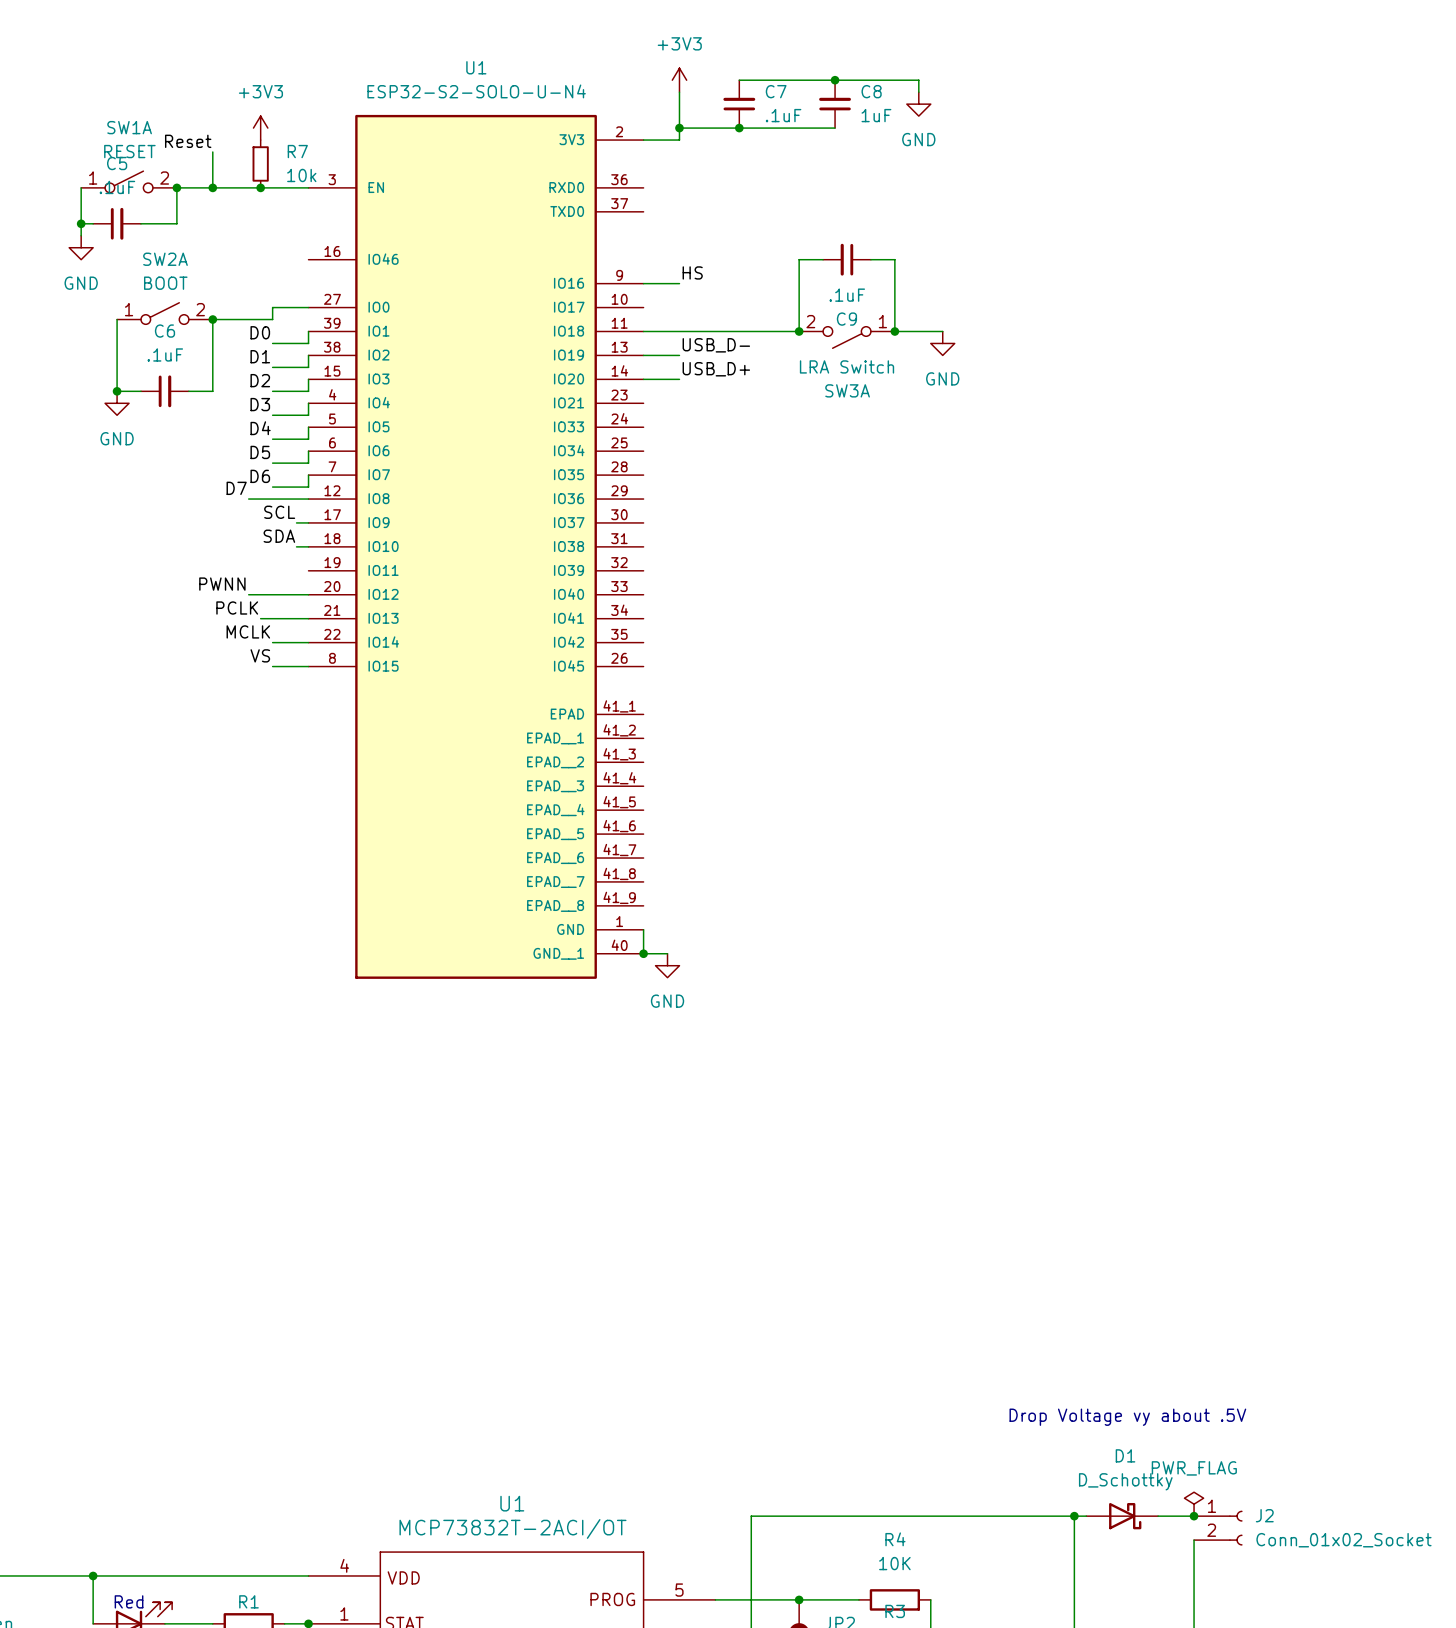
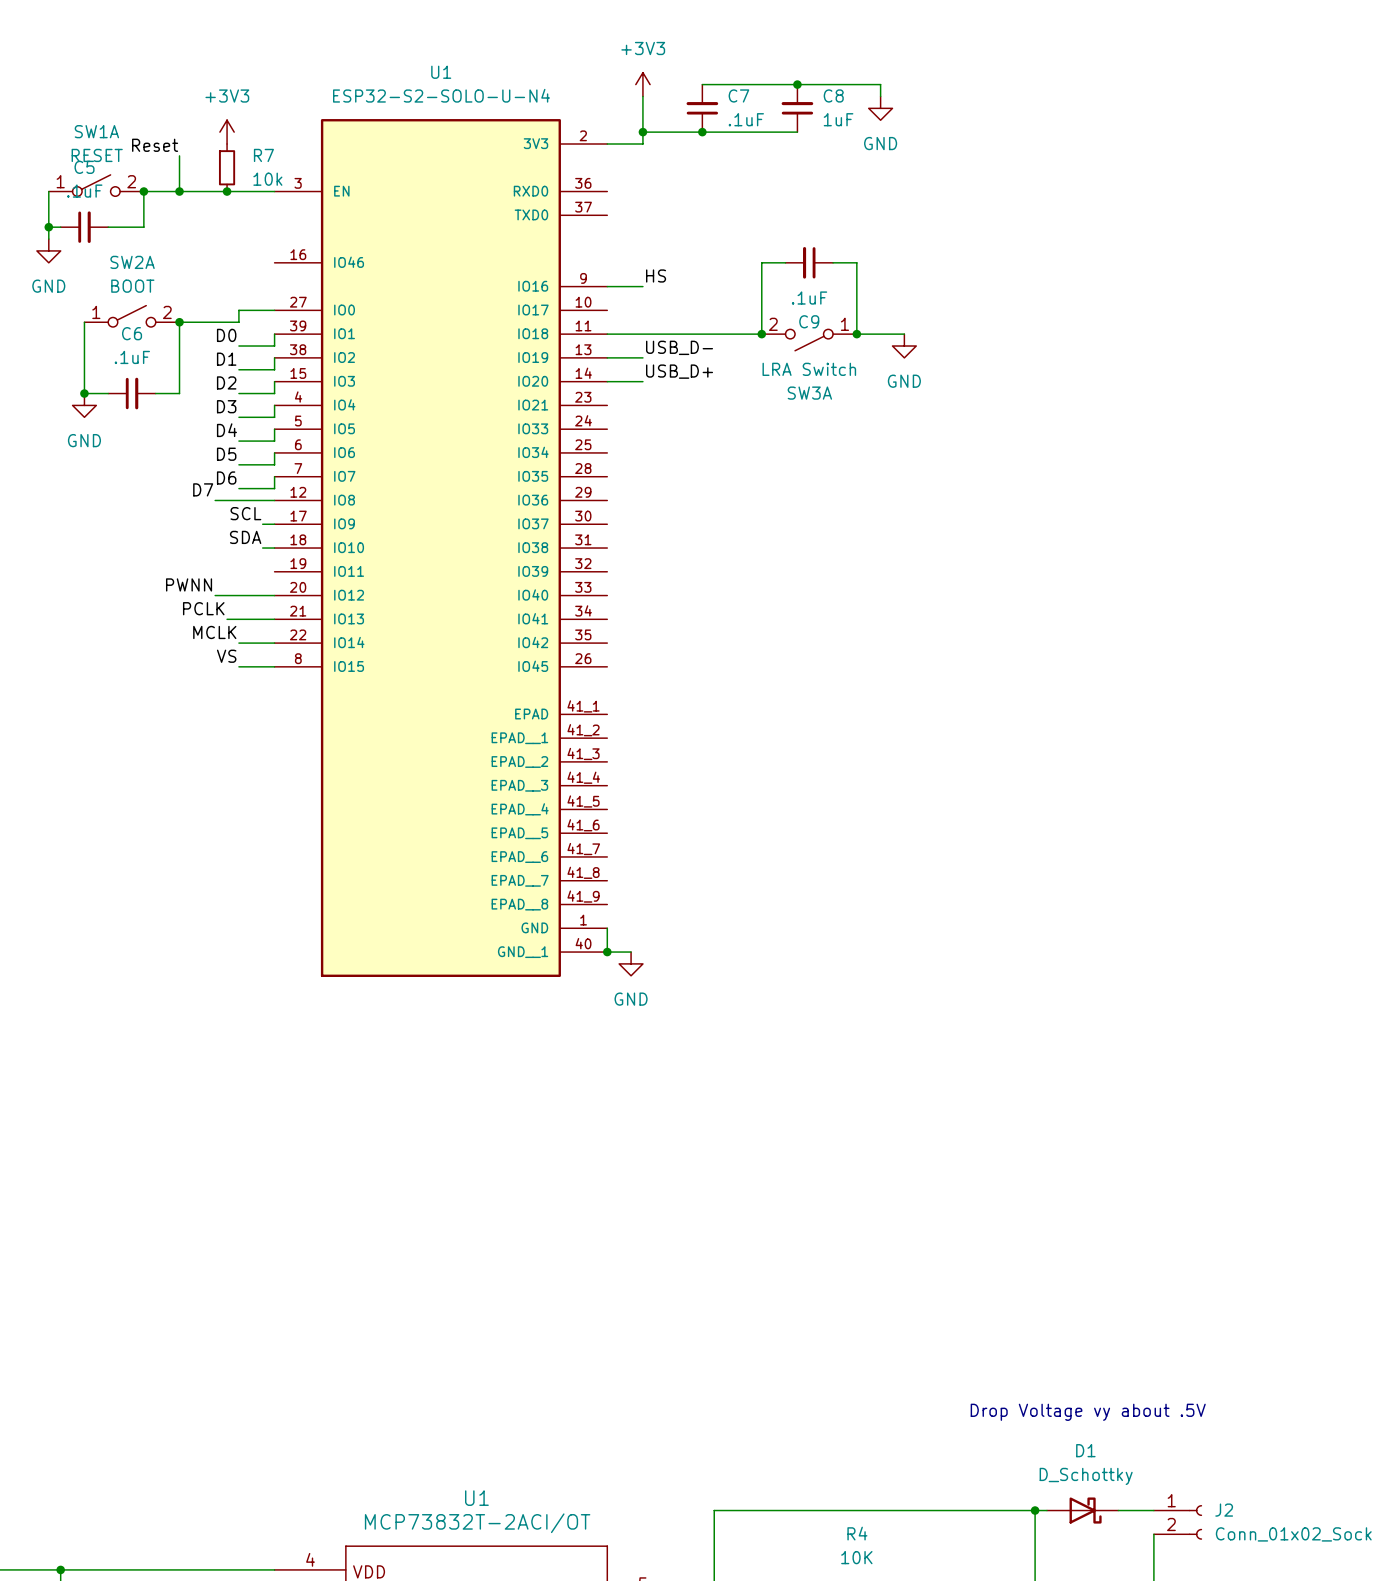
power symbol: PWR_FLAG (1194, 1504) -> none
junction: (1194, 1516) -> none

